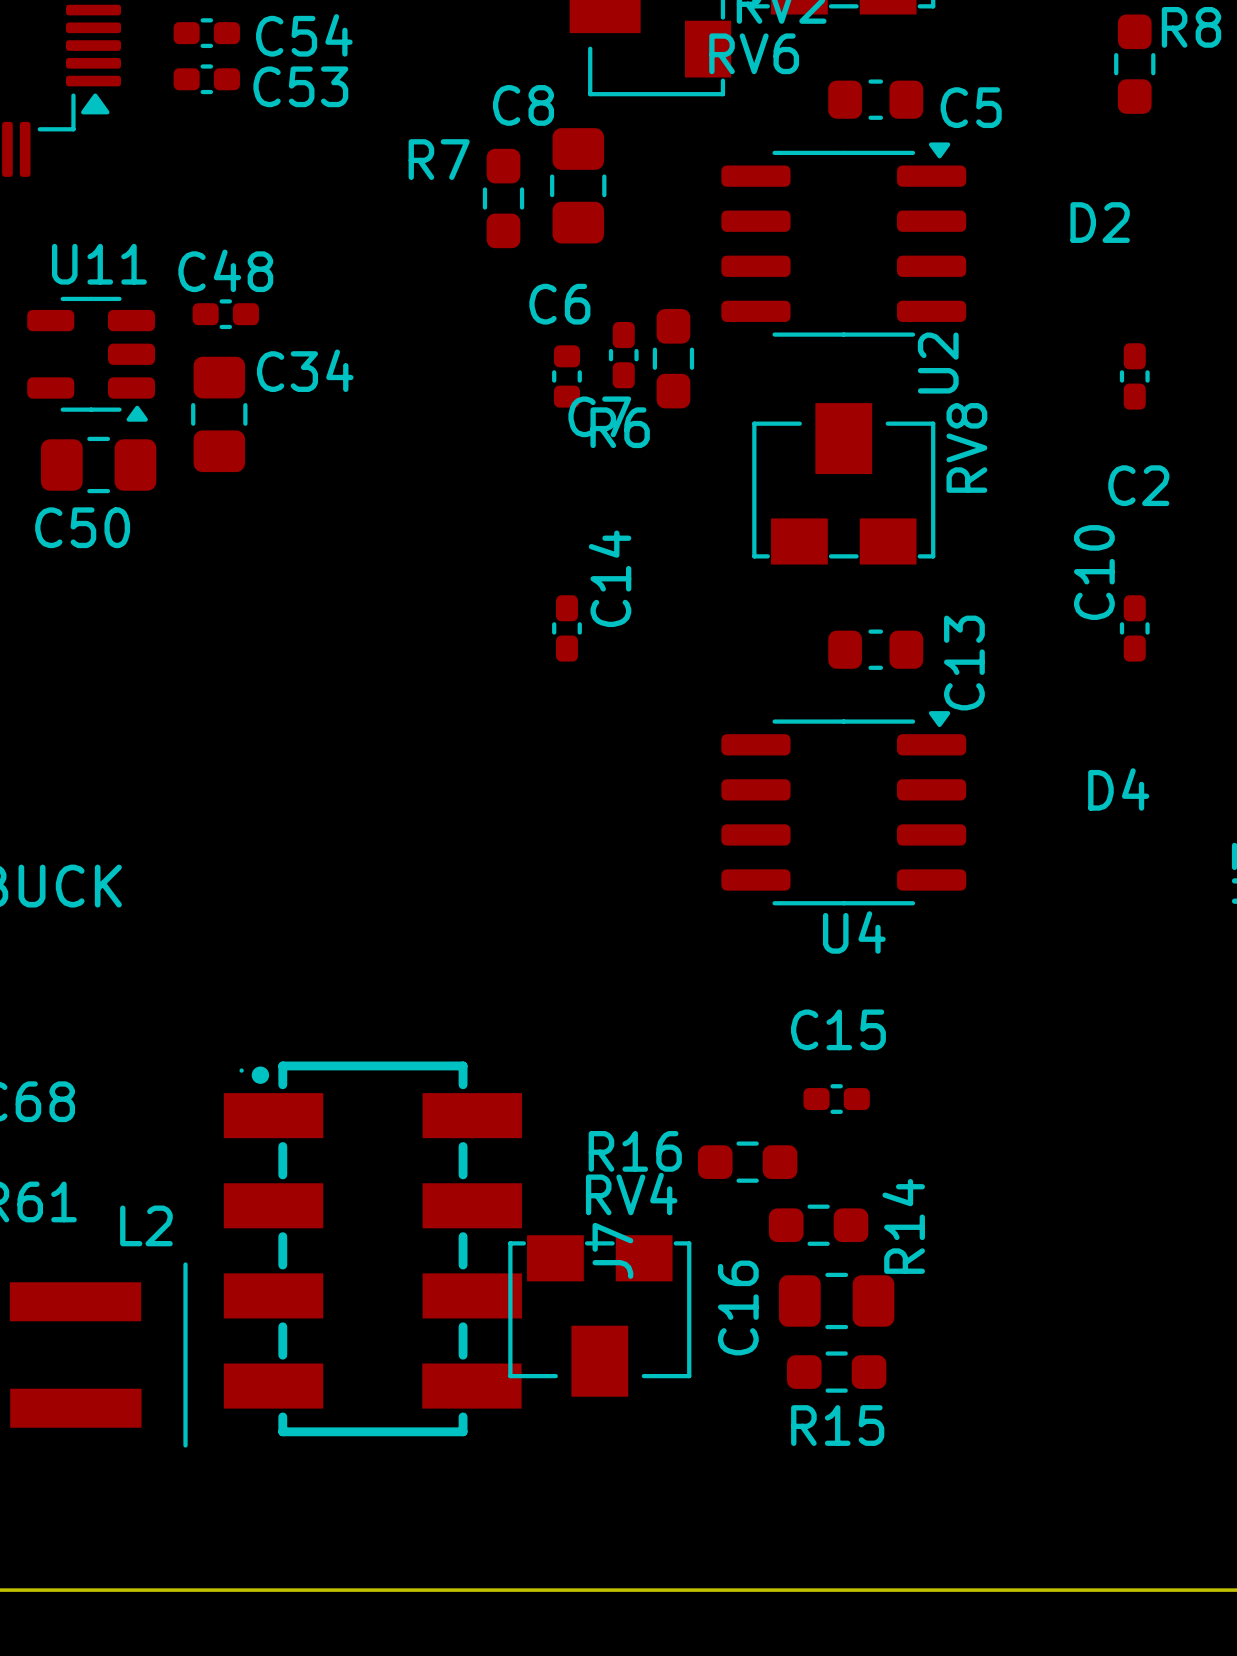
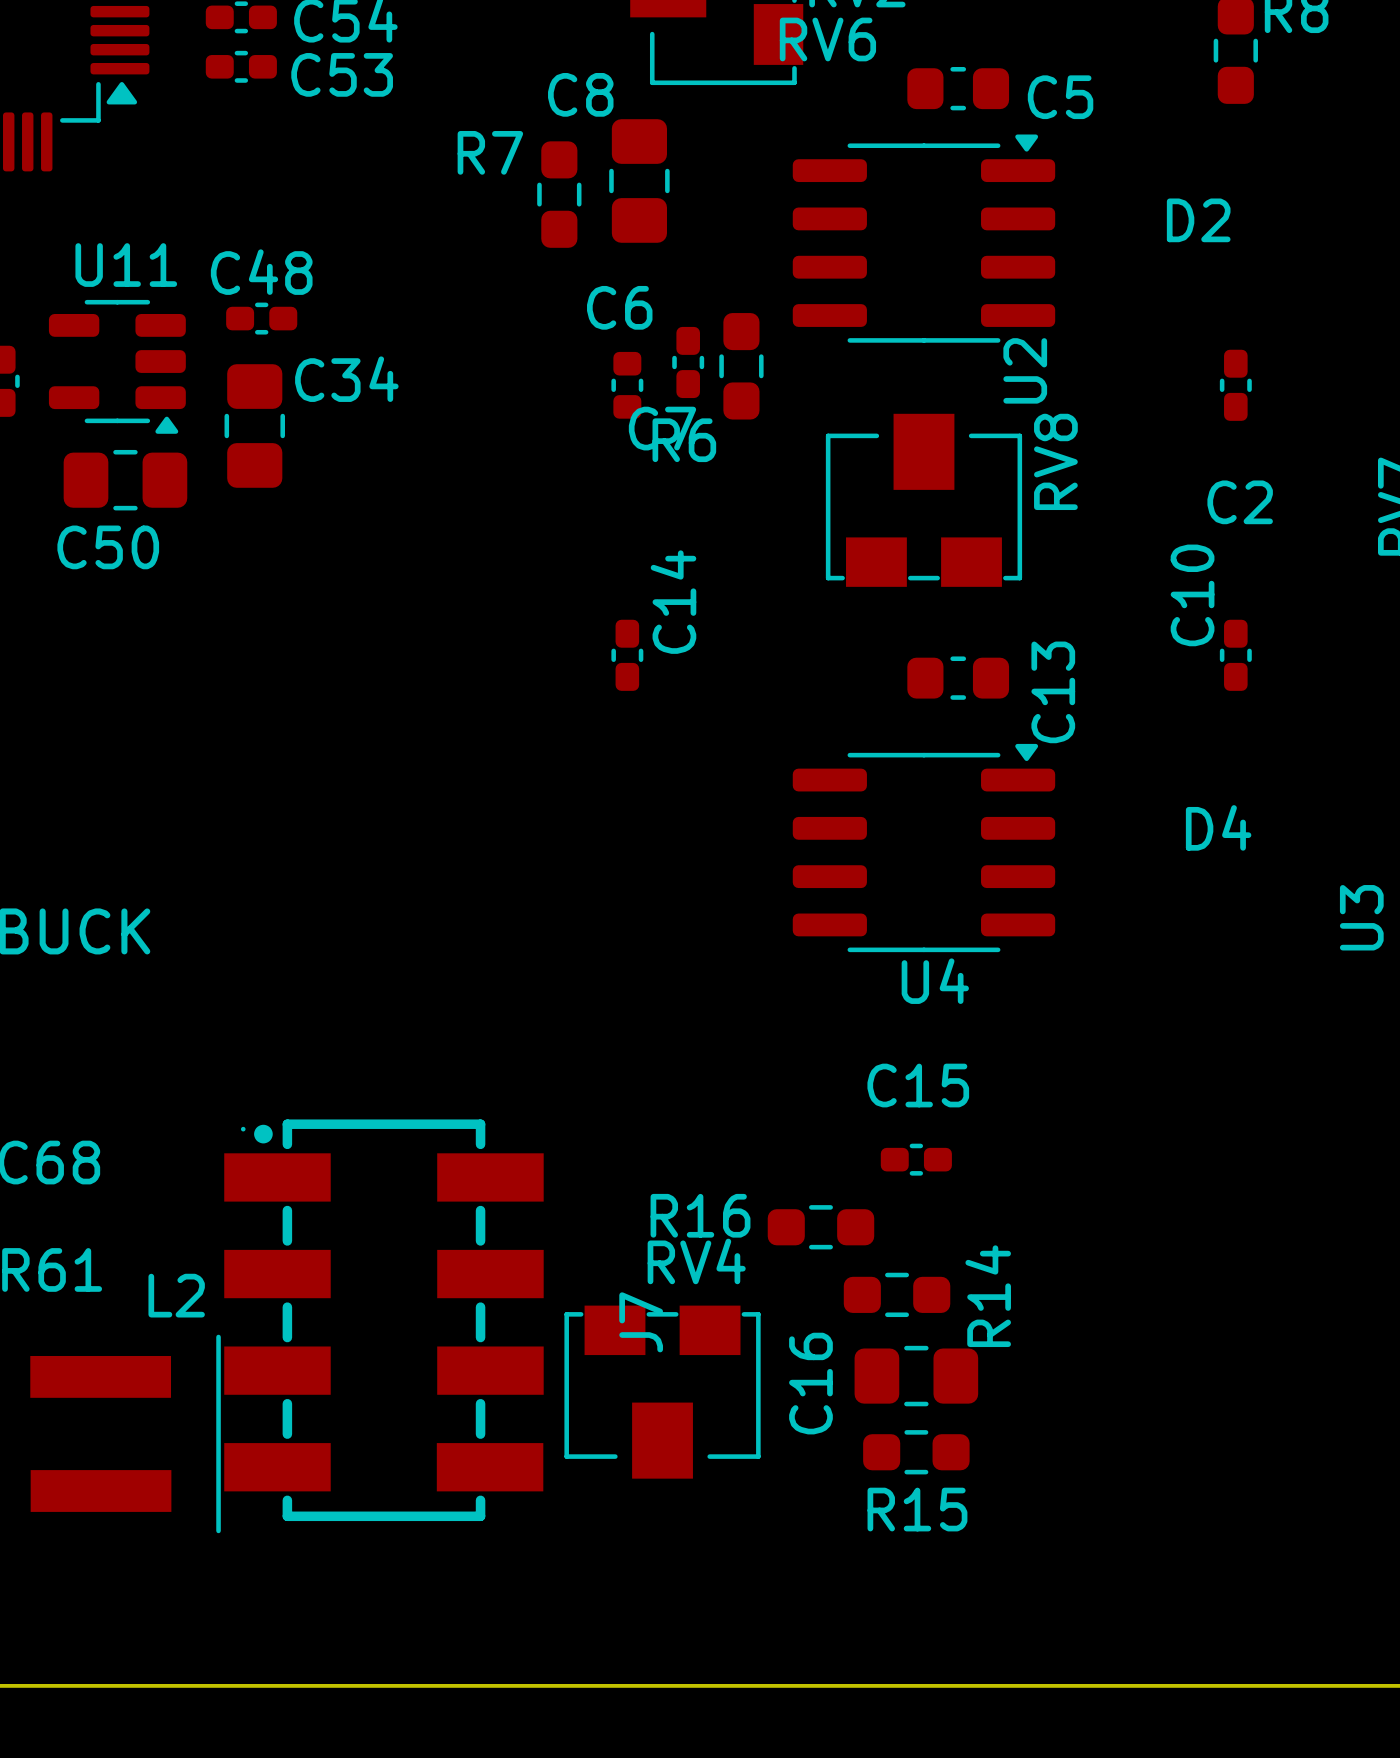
J7 position: (372, 1248) -> (383, 1320)

